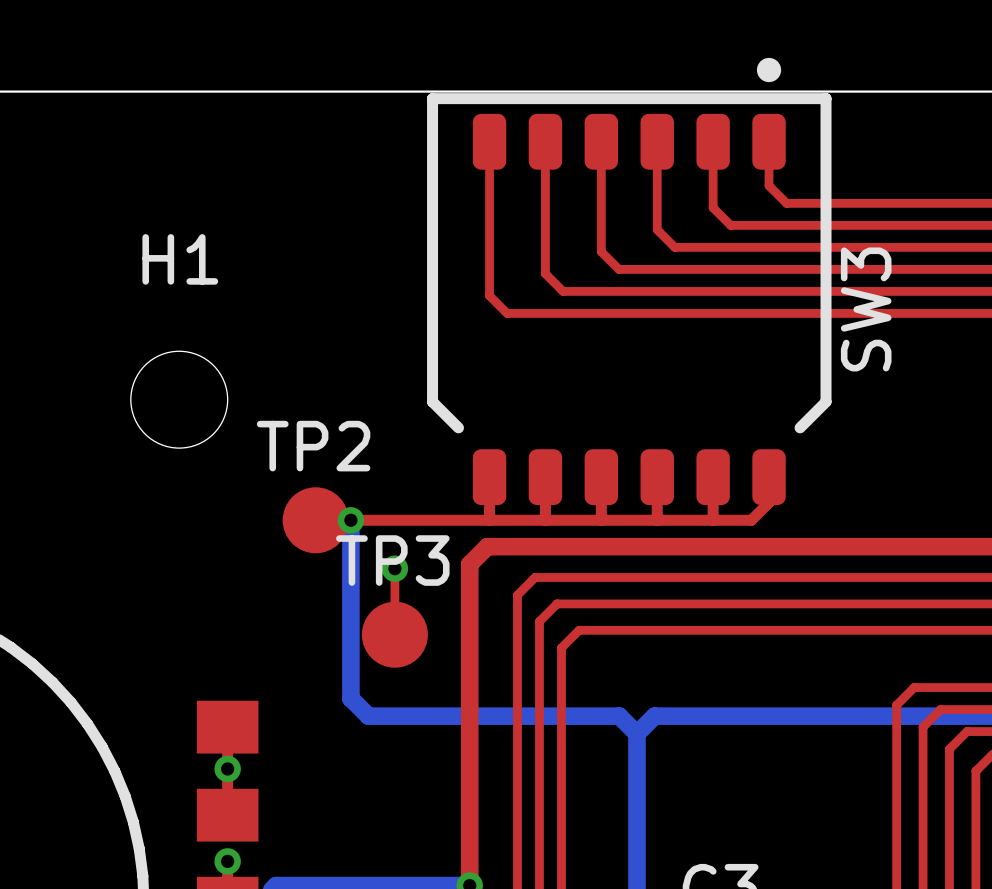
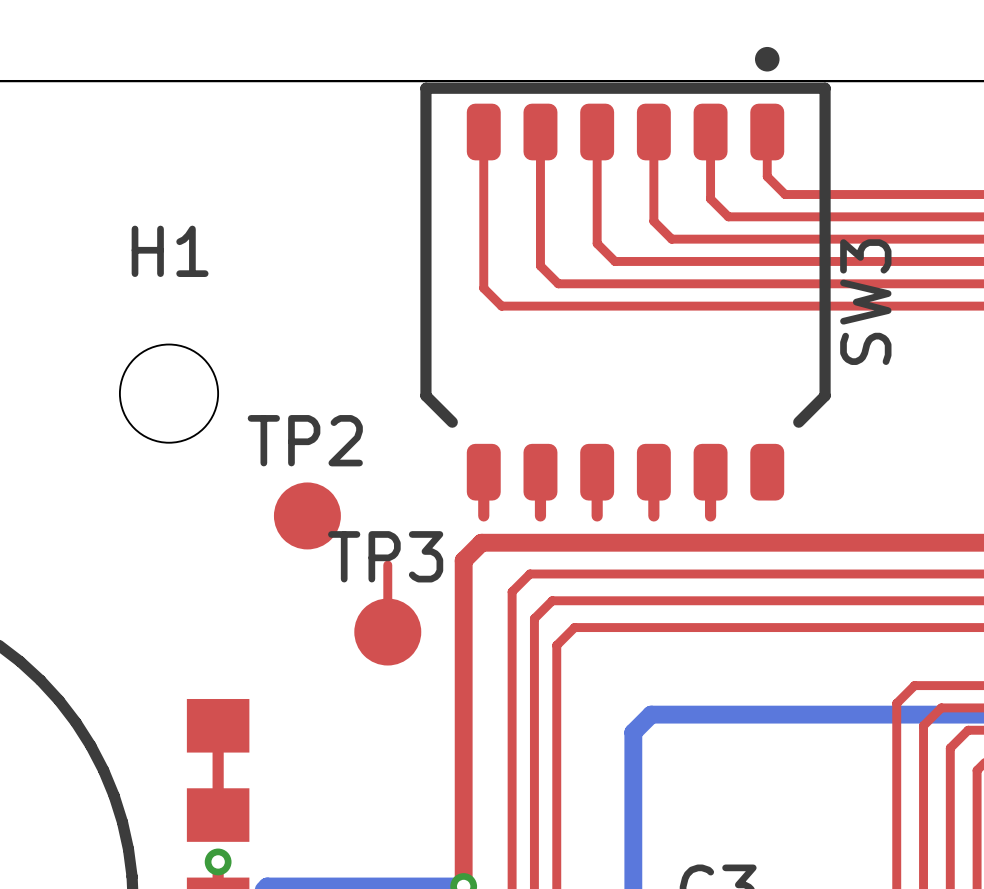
top track: (769, 477) (769, 502) (751, 520) (315, 520) -> none
bottom track: (350, 520) (350, 698) (368, 716) (619, 716) (636, 733) -> none
via: (350, 520) -> none
via: (394, 568) -> none
via: (227, 768) -> none

